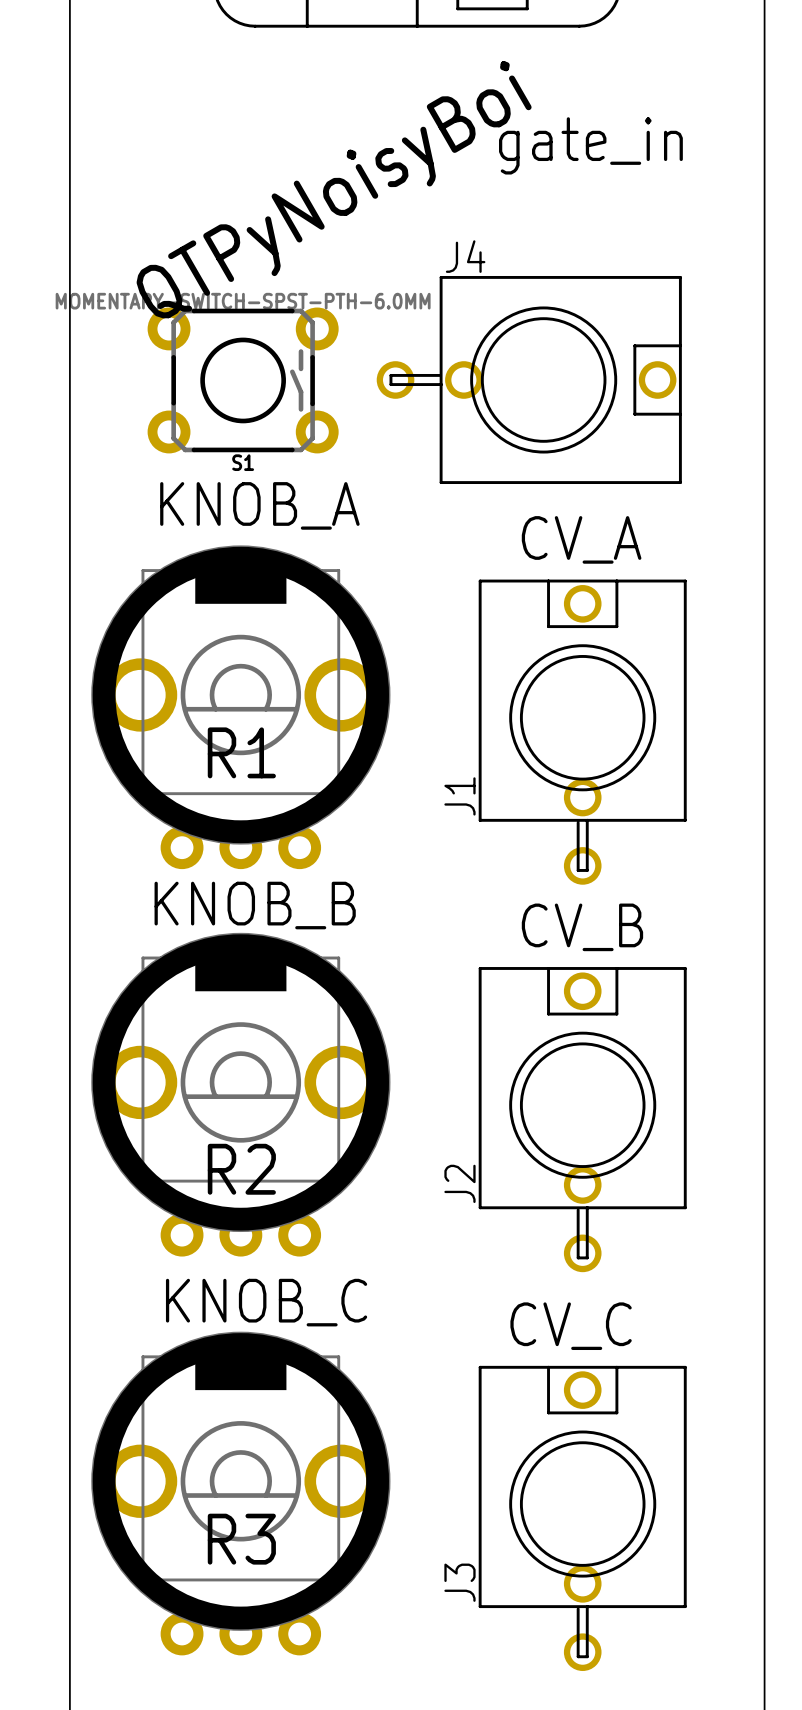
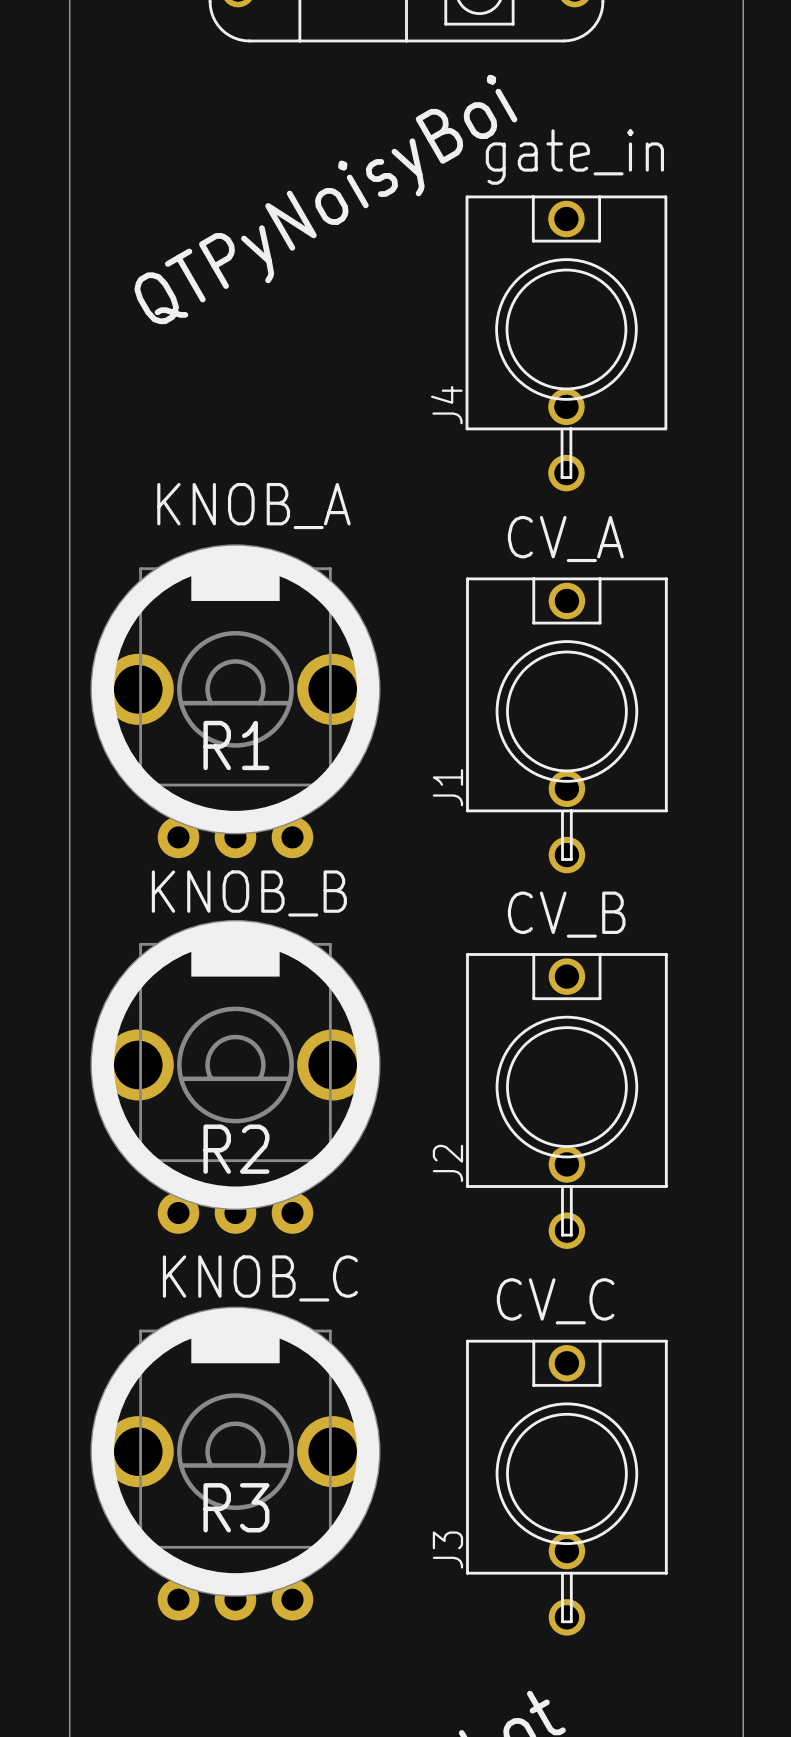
J4 rotation: 0° (529, 379) -> 90° counterclockwise (566, 343)
S1: MOMENTARY-SWITCH-SPST-PTH-6.0MM (243, 380) -> none

